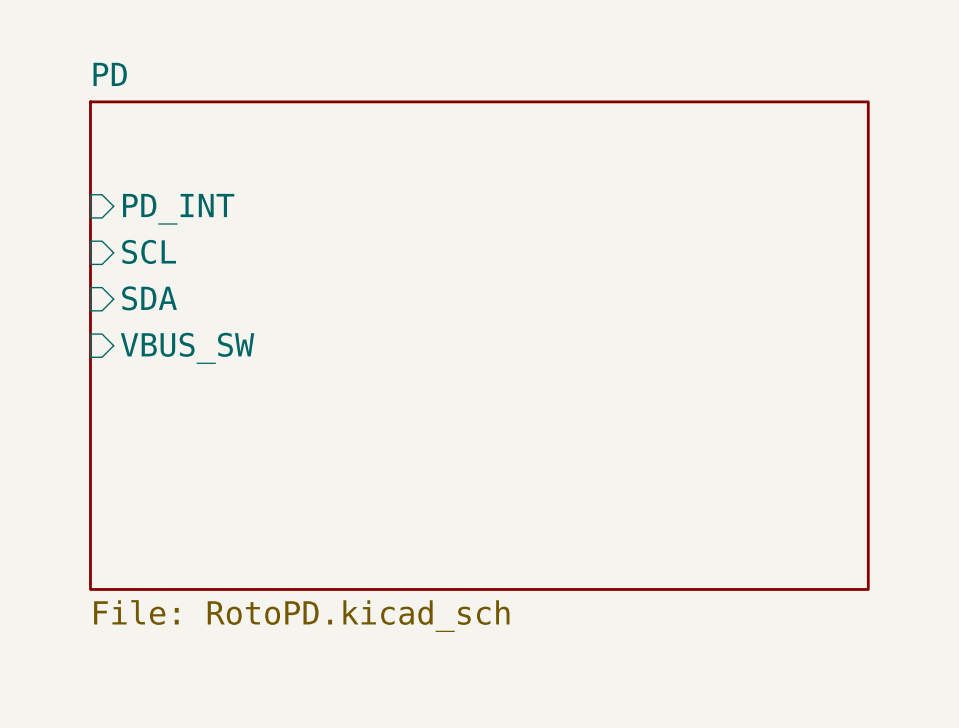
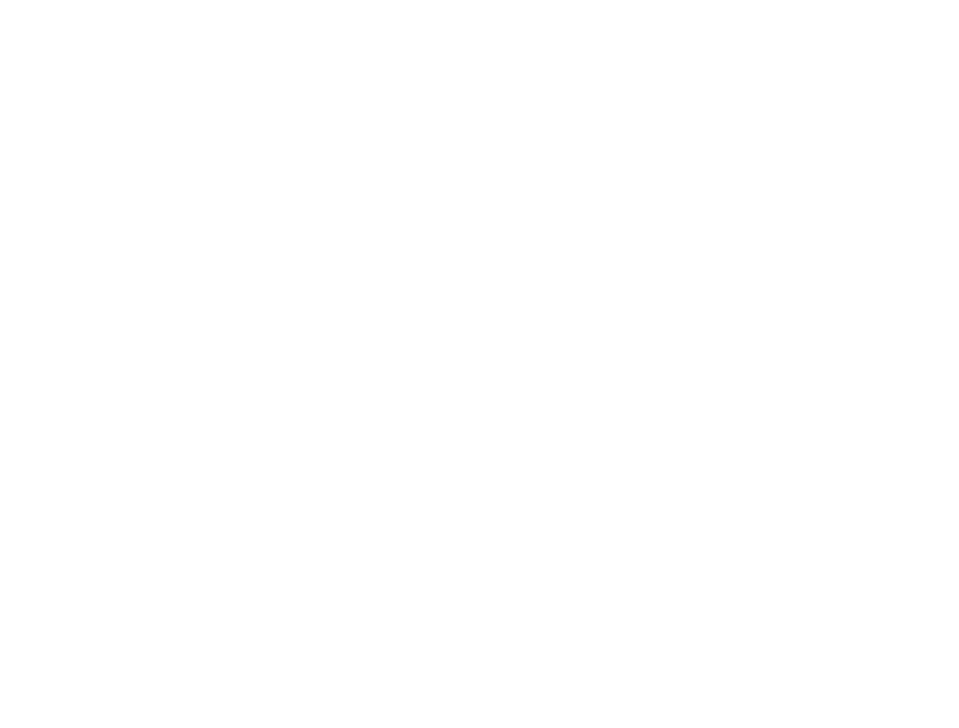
sheet pin: PD_INT (178, 209) -> none
sheet pin: SCL (149, 251) -> none
sheet pin: SDA (149, 298) -> none
sheet PD: File: RotoPD.kicad_sch (479, 345) -> none
sheet pin: VBUS_SW (187, 348) -> none

